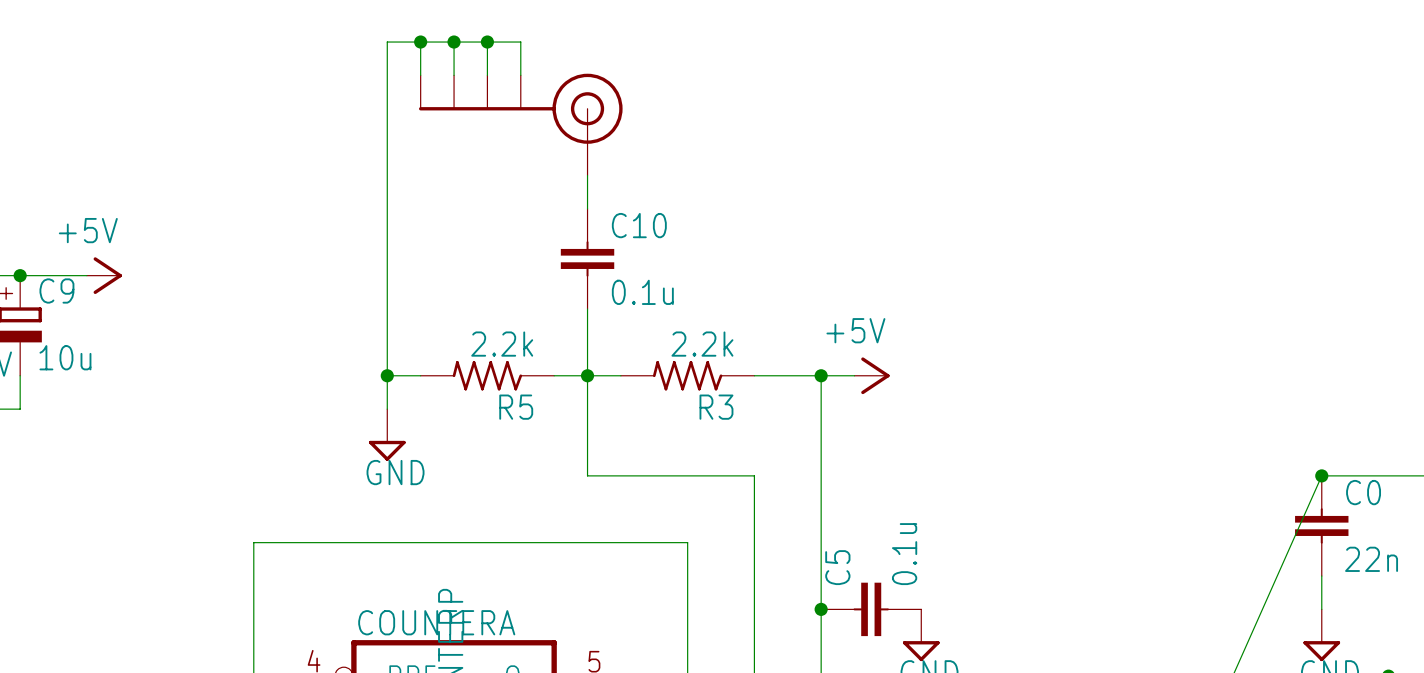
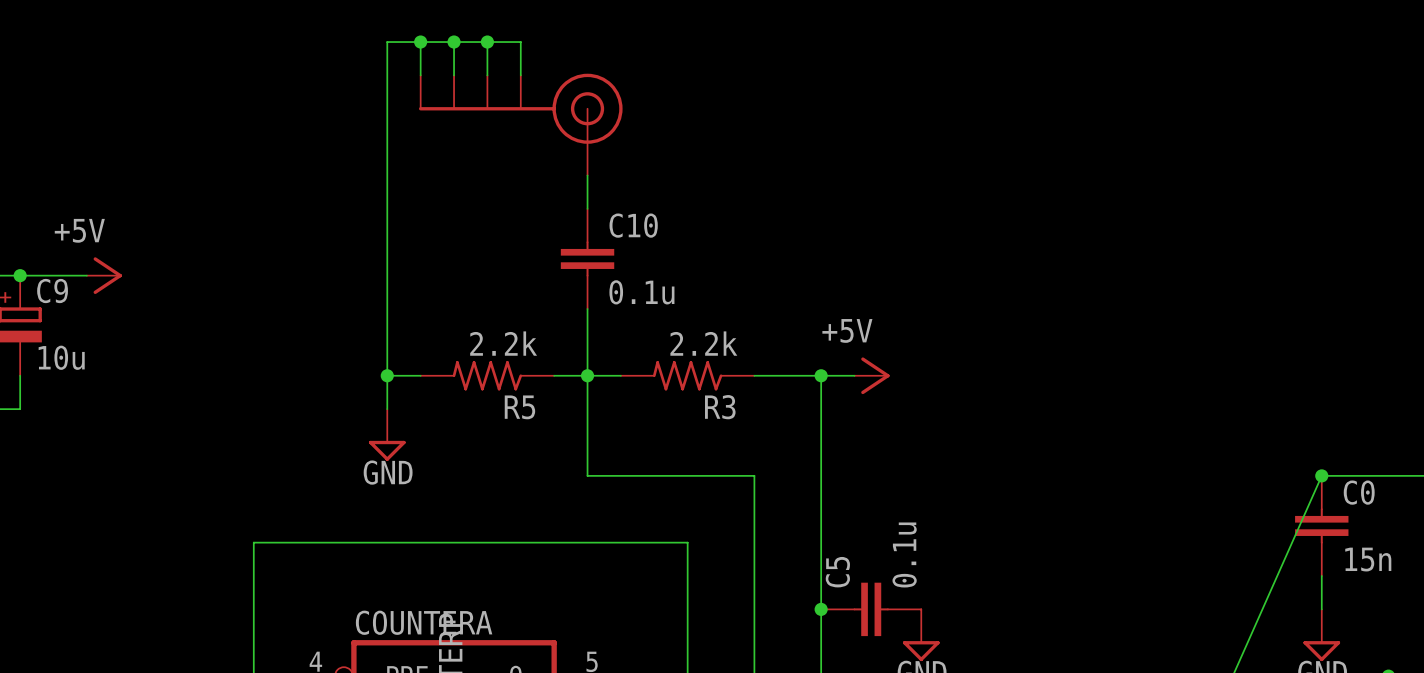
C0 value: 22n (1371, 559) -> 15n (1368, 559)

